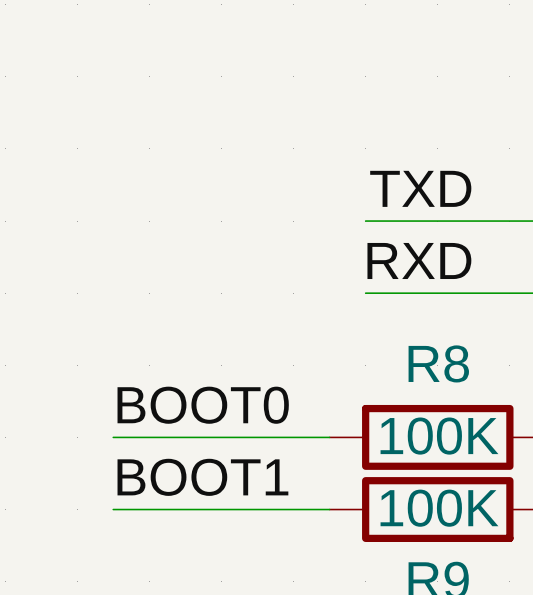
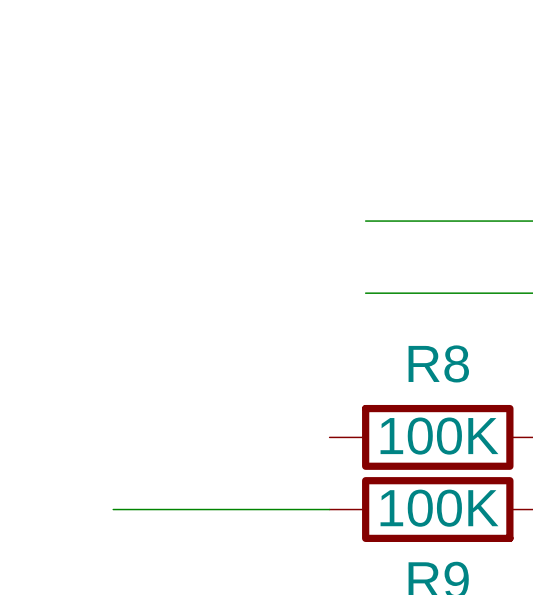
label: TXD (420, 188) -> none
label: RXD (419, 260) -> none
label: BOOT0 (203, 405) -> none
wire: (113, 437) (329, 437) -> none
label: BOOT1 (202, 477) -> none

